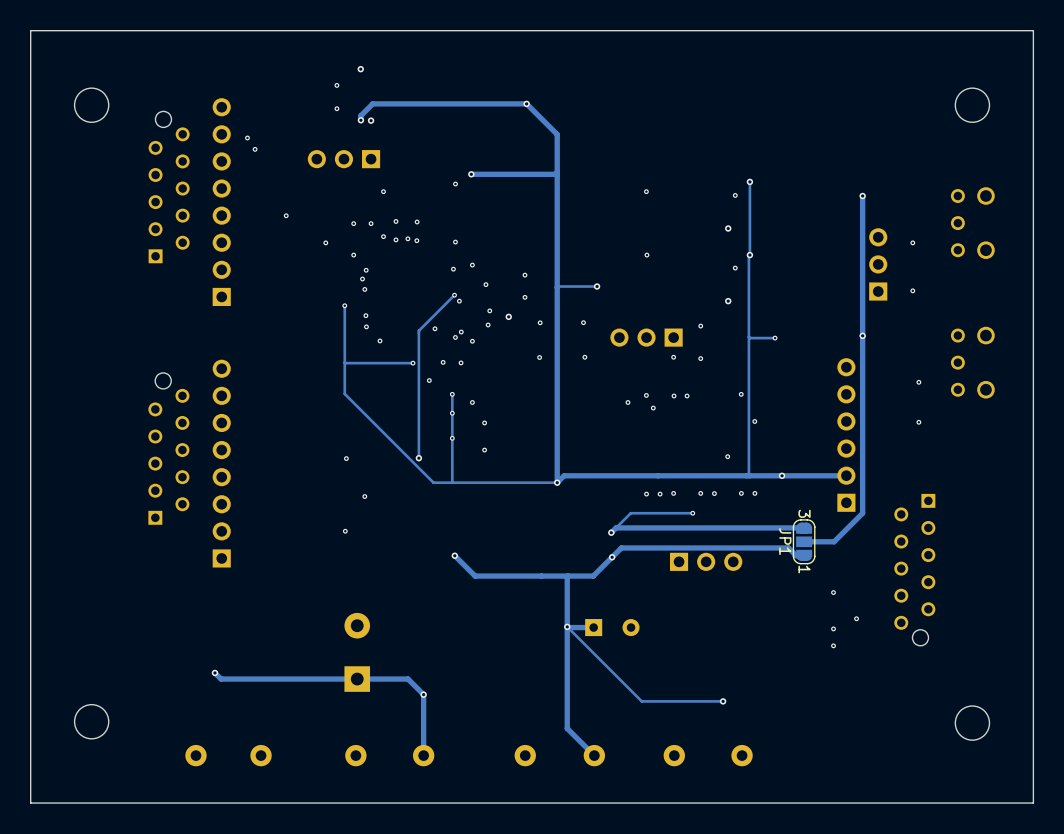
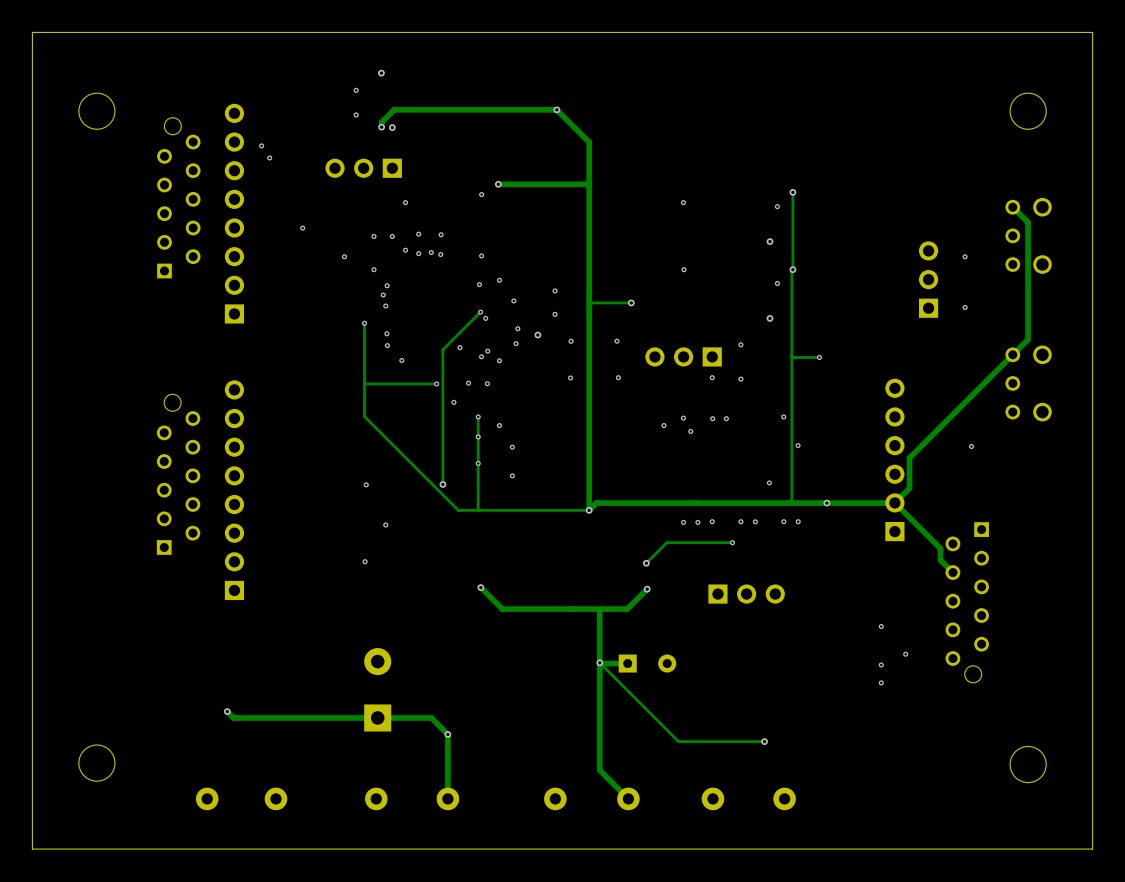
track: (862, 195) (862, 513) (834, 541) (804, 541) -> none
via: (862, 195) -> none
track: none -> (1012, 207) (1028, 222) (1028, 339) (909, 458) (909, 488) (894, 502) (940, 548) (940, 560) (952, 572)
via: (862, 335) -> none
via: (918, 382) -> none
track: (804, 527) (616, 527) (611, 532) -> none
JP1: (804, 541) -> none
track: (804, 555) (796, 555) (788, 547) (621, 547) (612, 557) -> none

